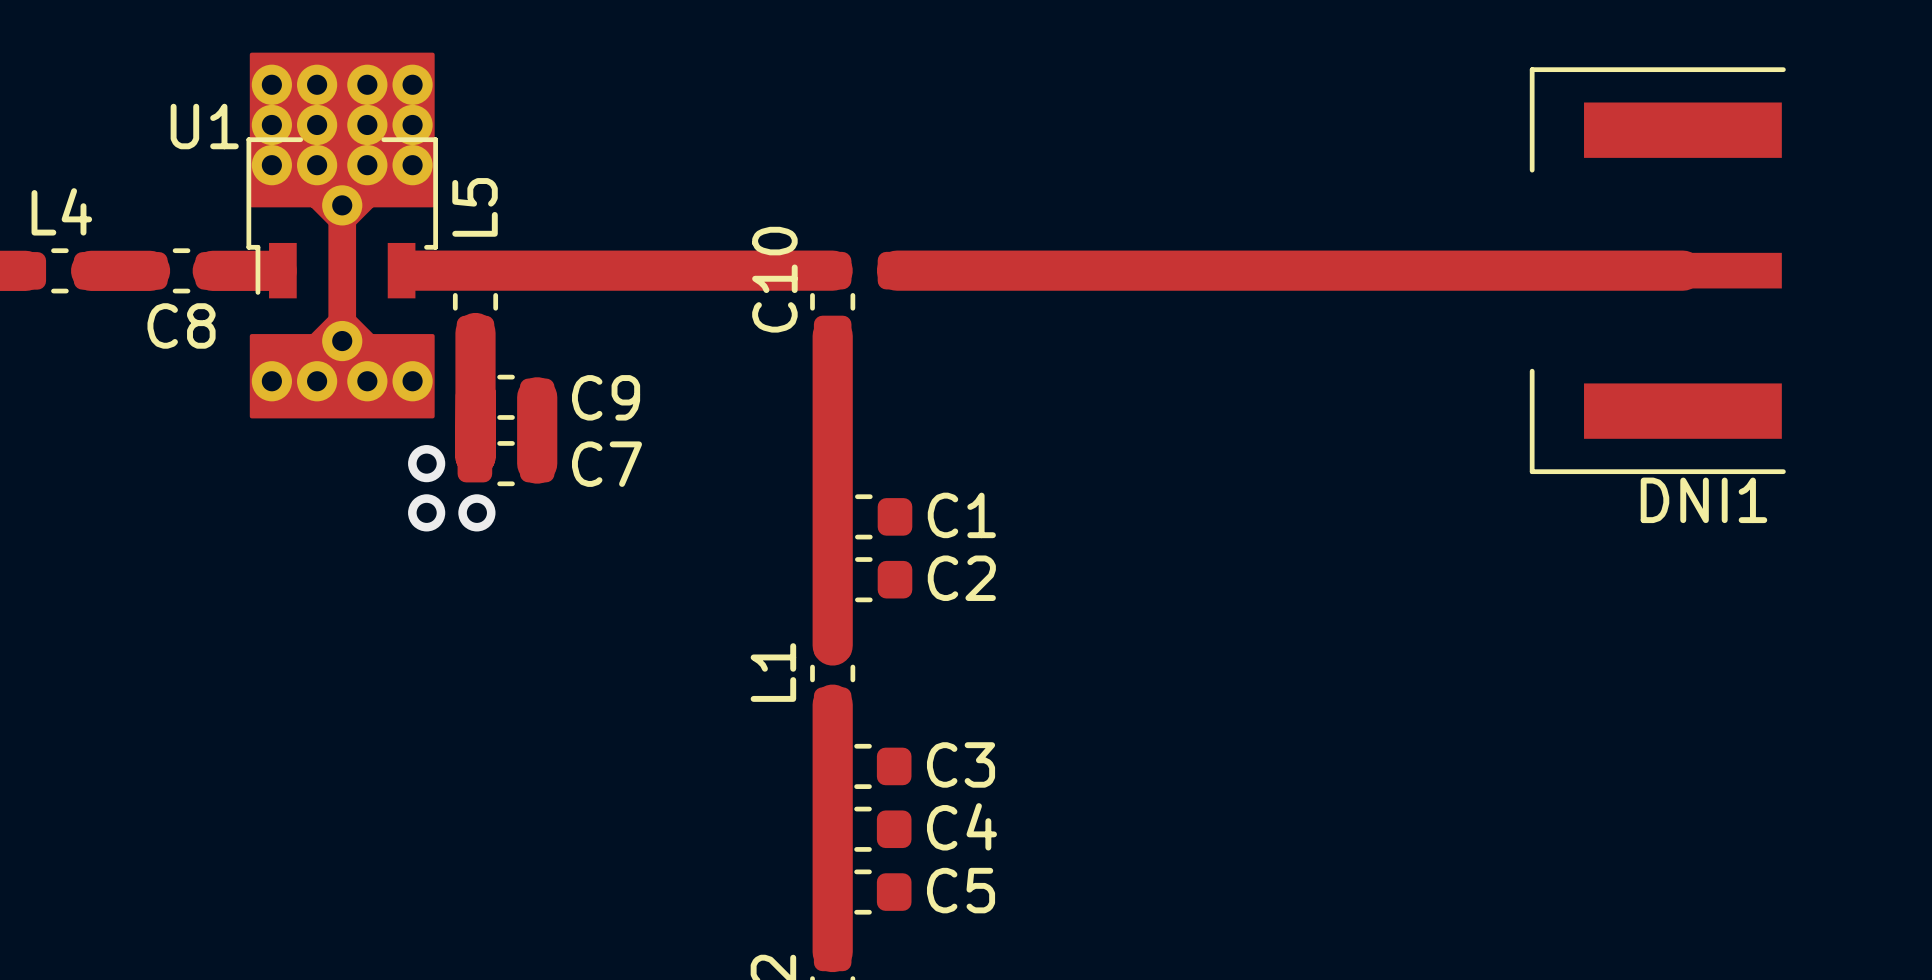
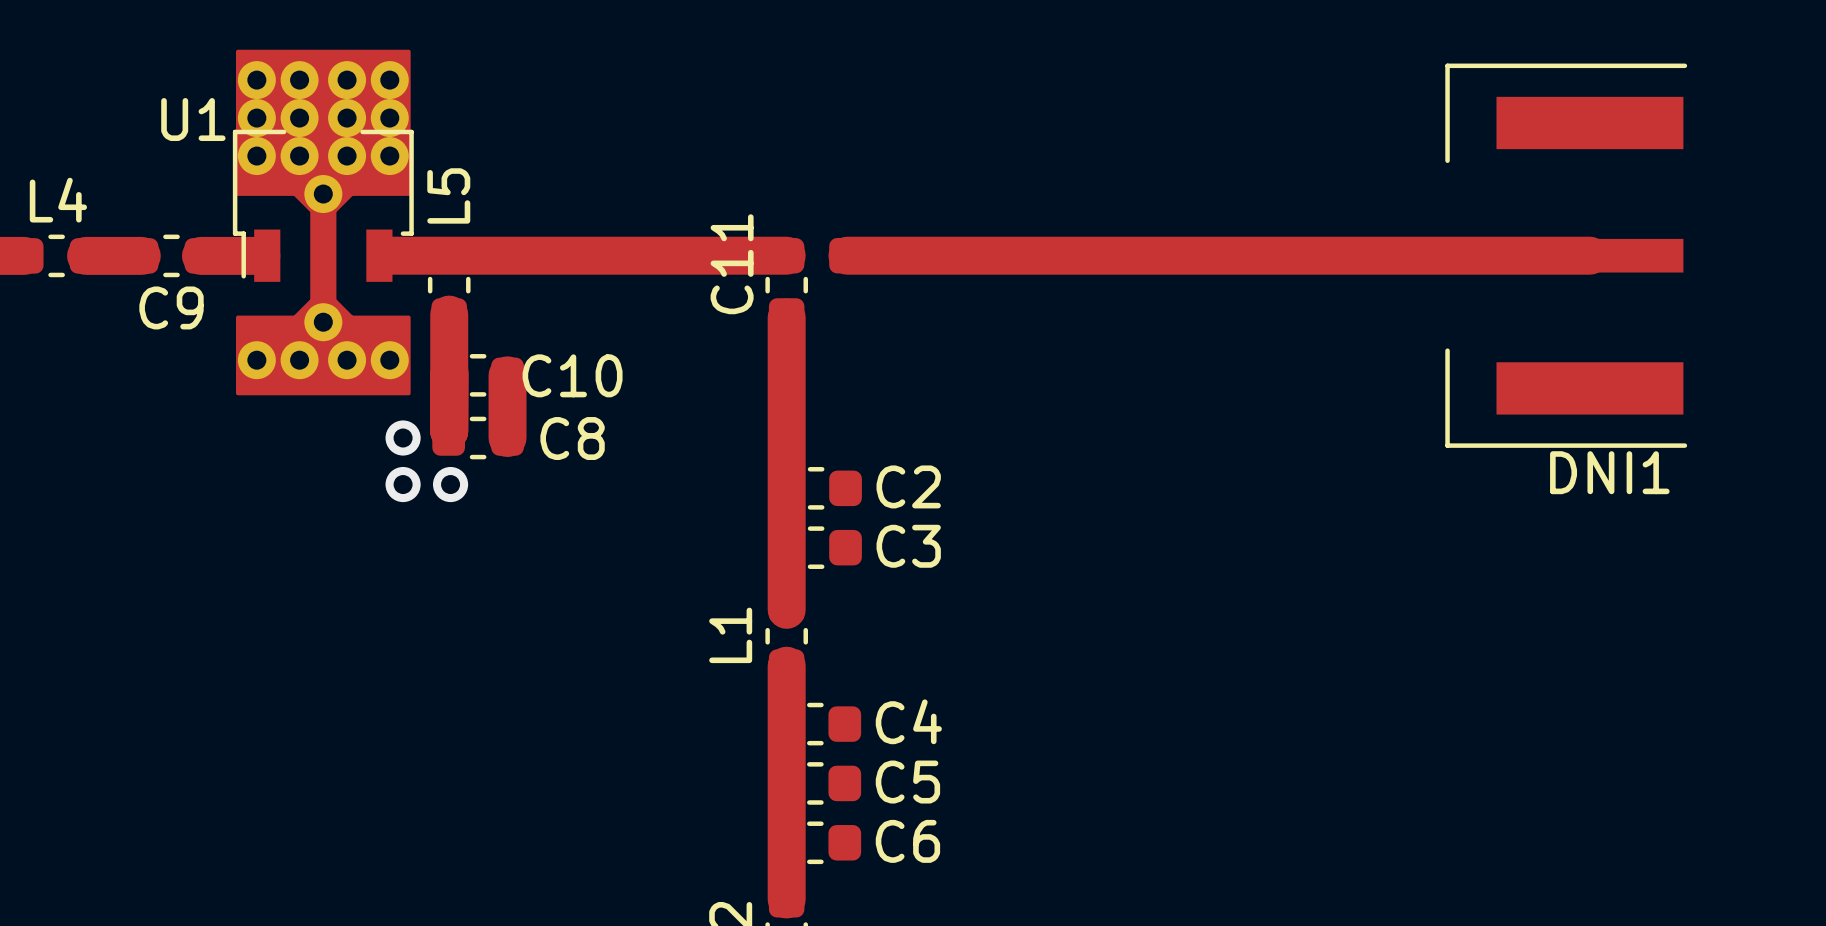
C10 name: C10 (774, 279) -> C11 (732, 264)
C8 name: C8 (181, 325) -> C9 (171, 307)
C9 name: C9 (606, 397) -> C10 (572, 375)
C7 name: C7 (606, 464) -> C8 (572, 438)
C1 name: C1 (961, 515) -> C2 (908, 486)
C2 name: C2 (961, 578) -> C3 (908, 546)
C3 name: C3 (961, 764) -> C4 (908, 721)
C4 name: C4 (961, 826) -> C5 (907, 782)
C5 name: C5 (961, 890) -> C6 (907, 841)

